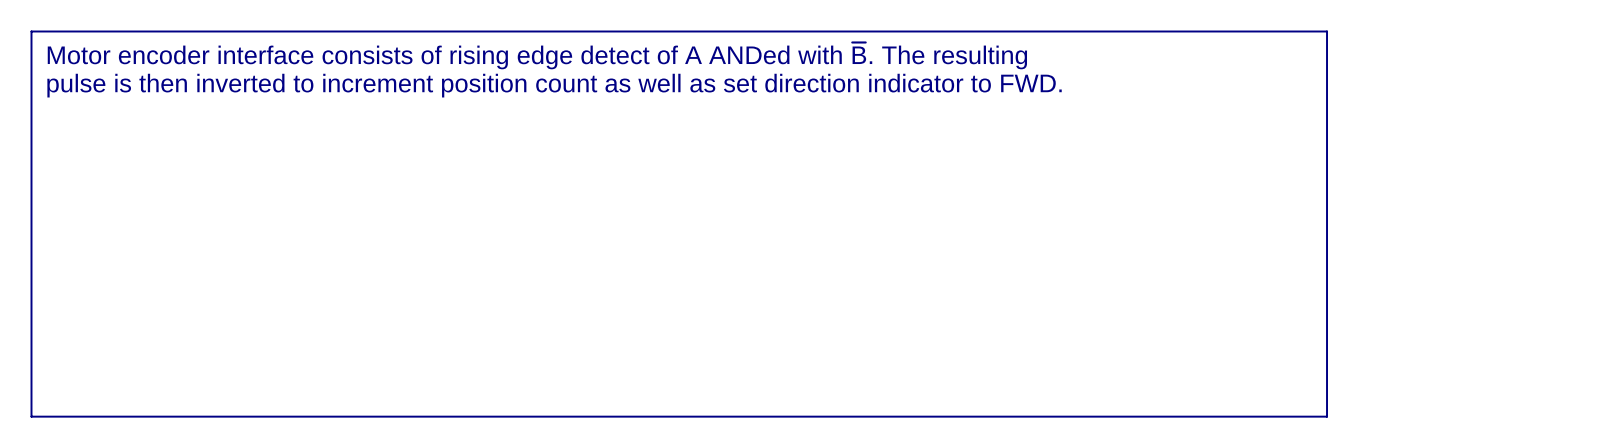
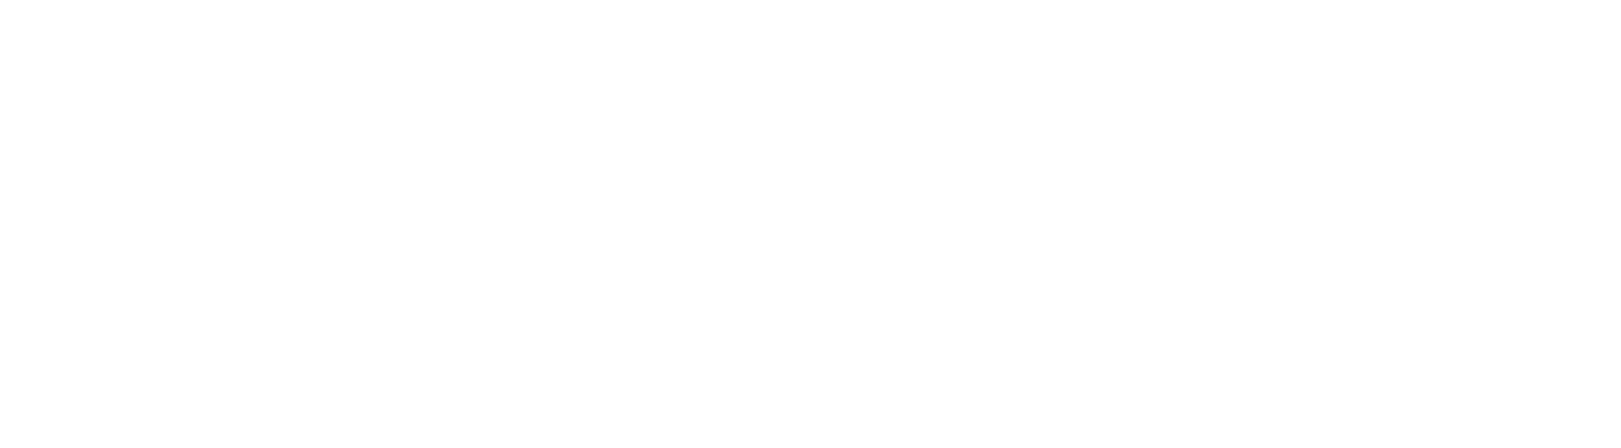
line: (31, 31) (1327, 31) (1327, 416) (31, 416) (31, 31) -> none
text: Motor encoder interface consists of rising edge detect of A ANDed with ~{B}. The resulting (537, 55) -> none
text: pulse is then inverted to increment position count as well as set direction indicator to FWD. (554, 85) -> none

